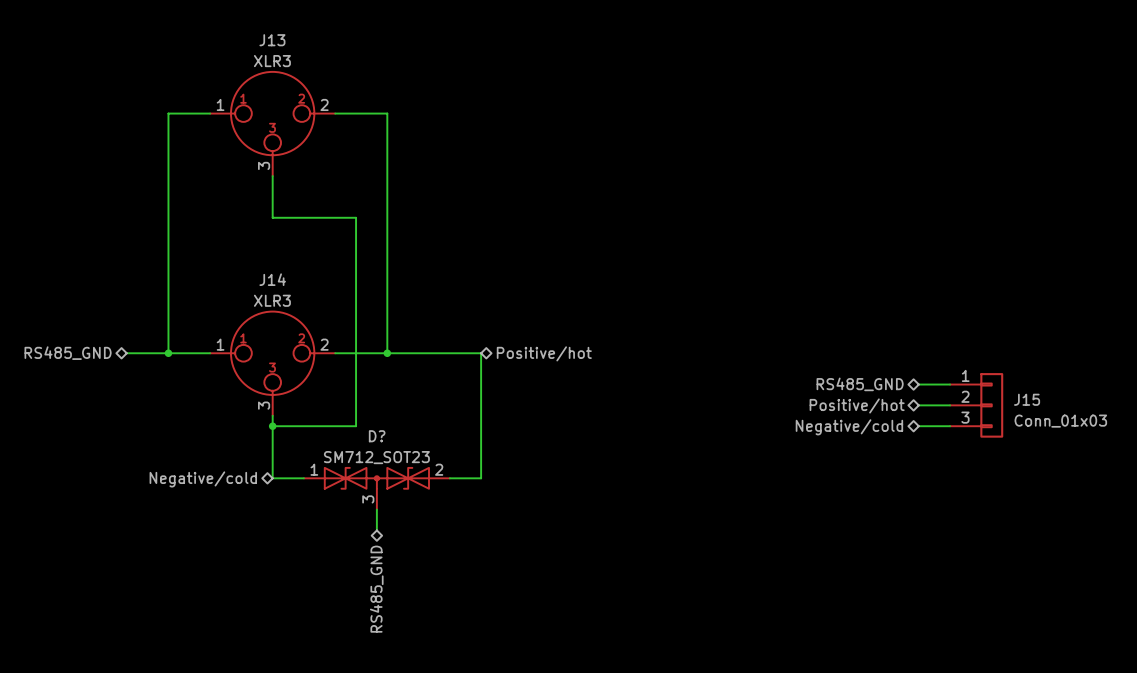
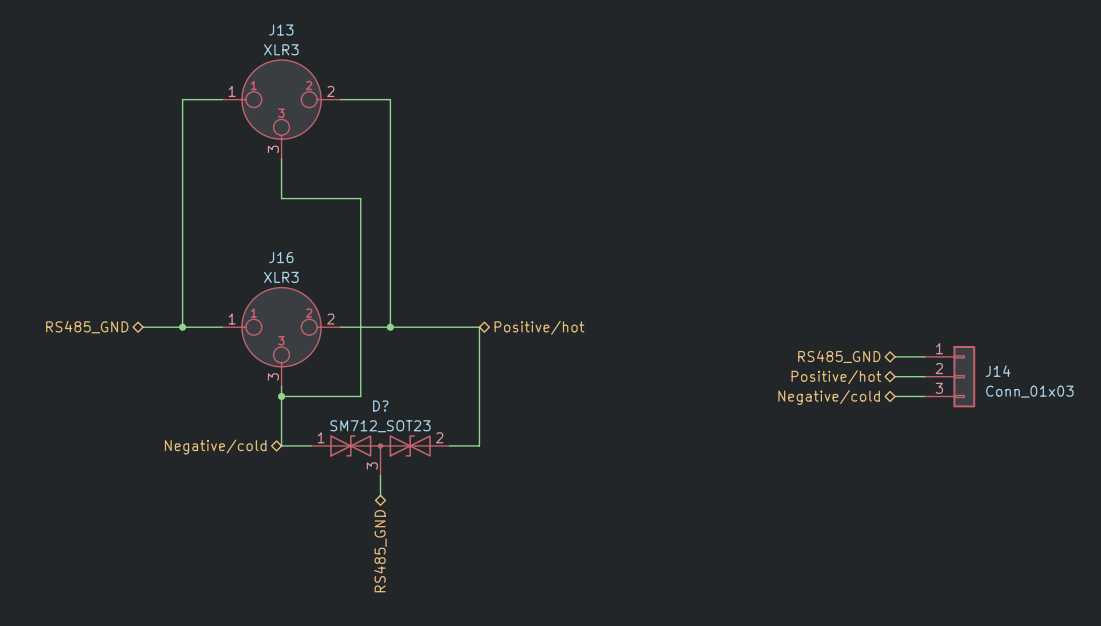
J14 name: J14 (272, 279) -> J16 (281, 257)
J15 name: J15 (1027, 399) -> J14 (998, 371)

